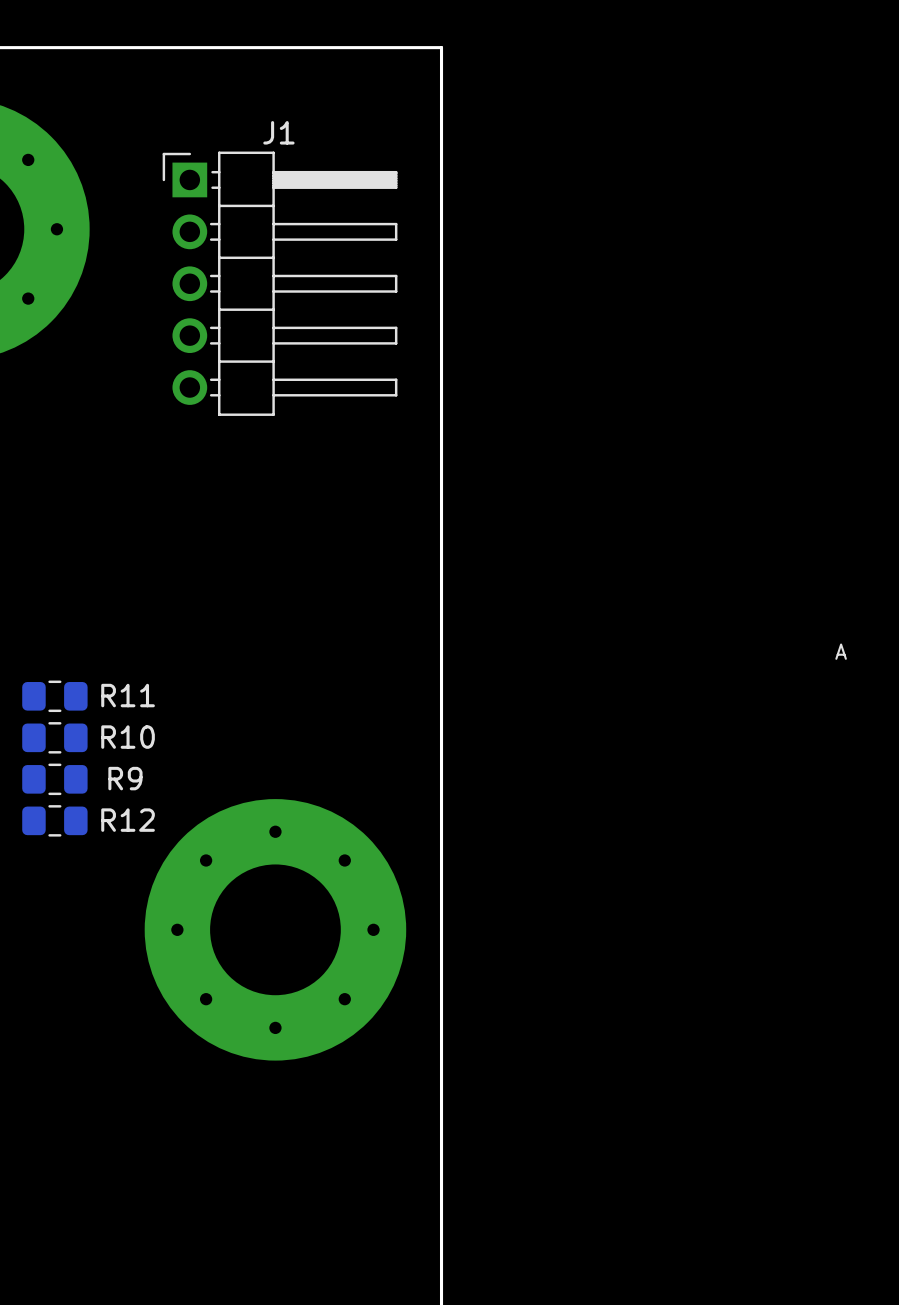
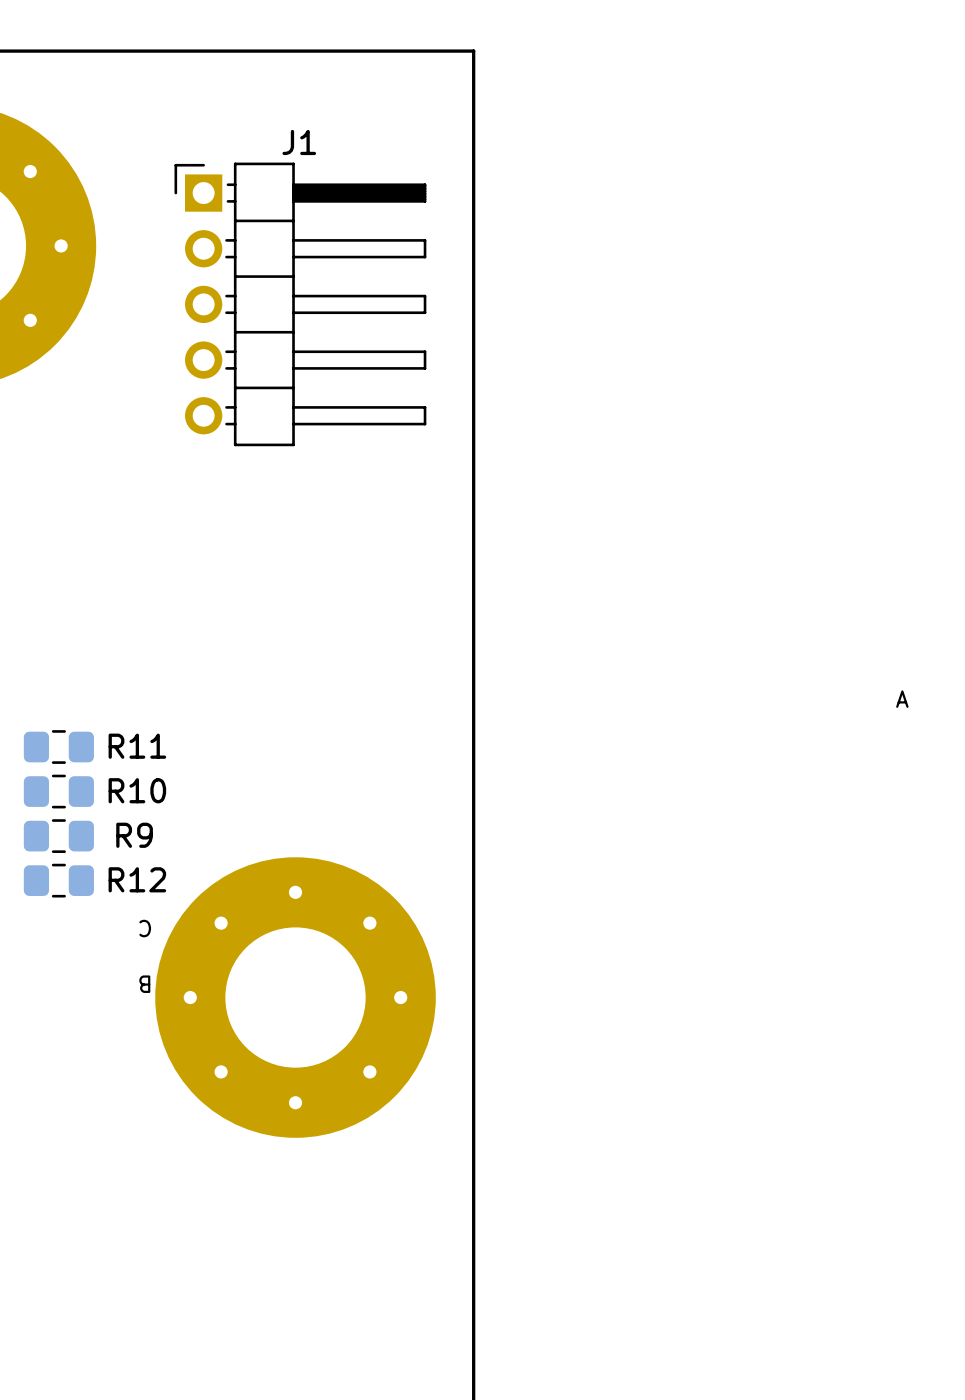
text: none -> C (145, 928)
text: none -> B (144, 984)

